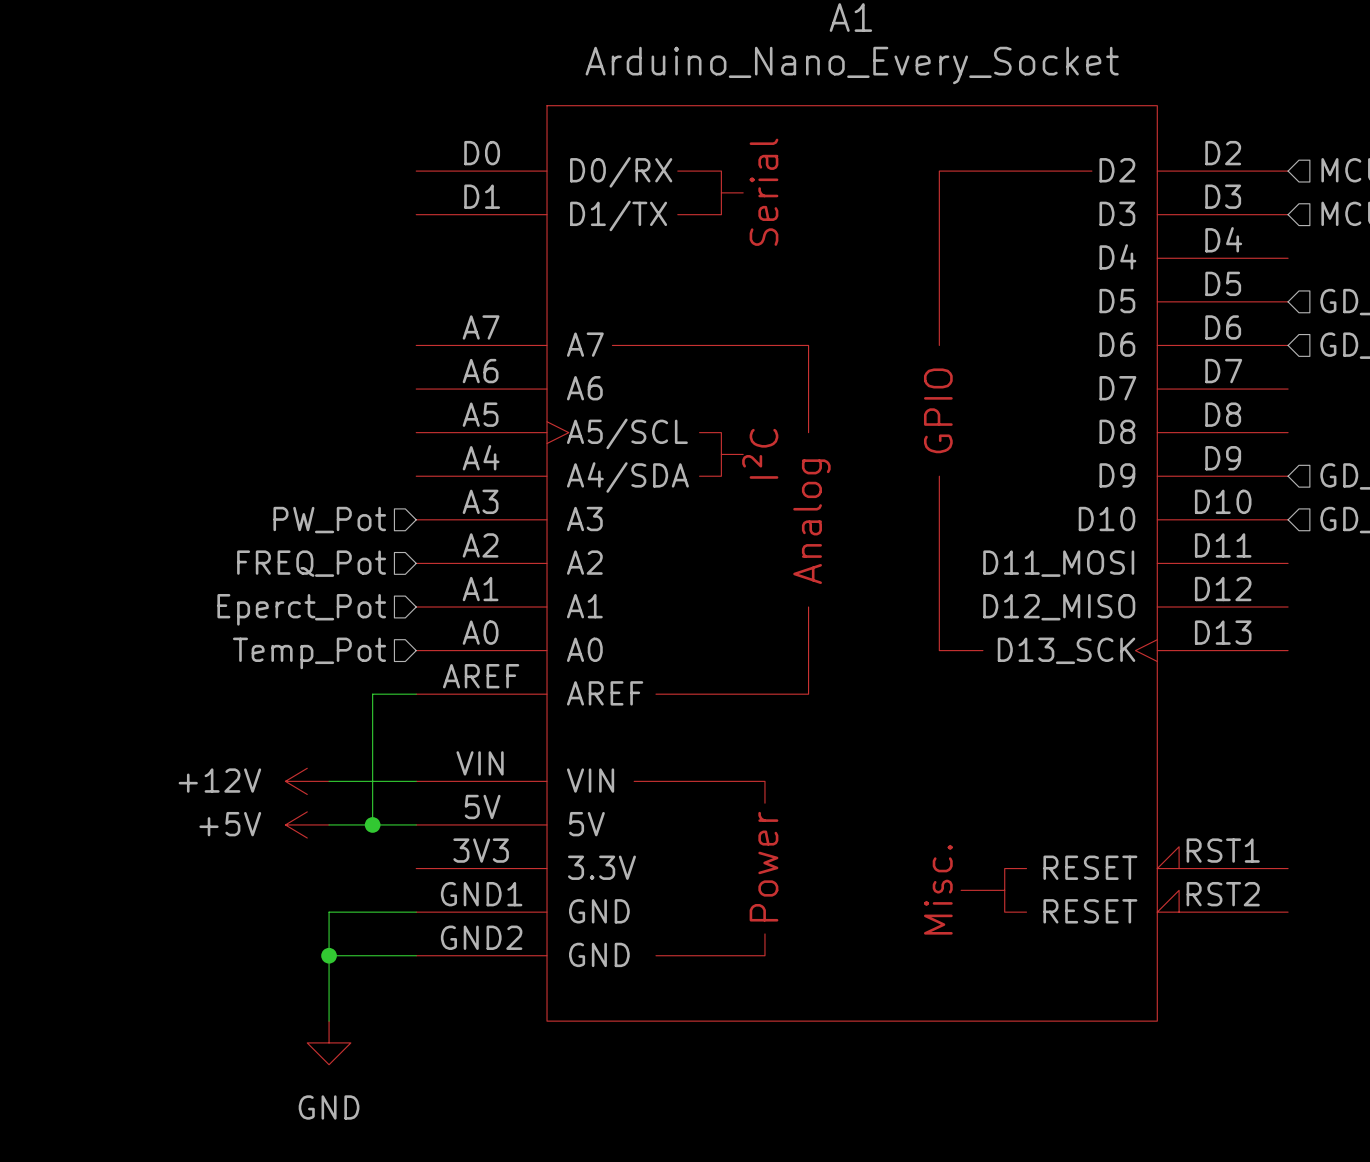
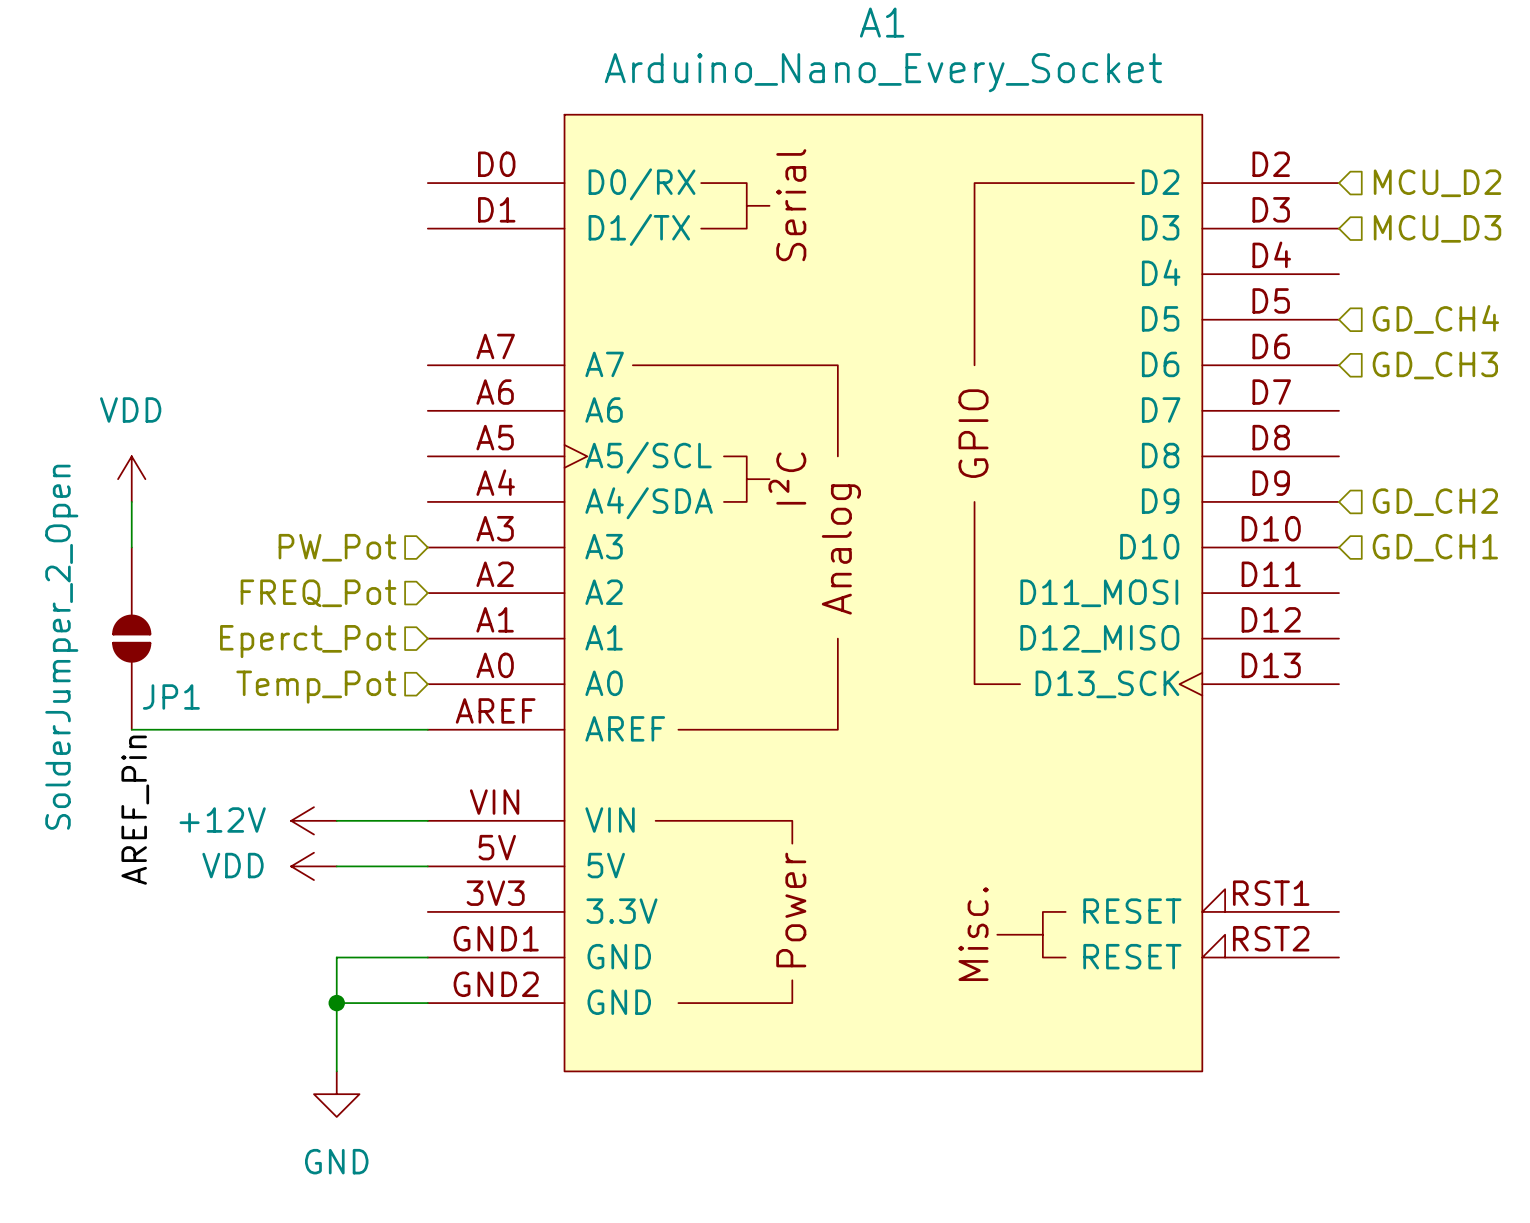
power symbol: none -> VDD (131, 479)
wire: none -> (131, 501) (131, 547)
JP1: none -> SolderJumper_2_Open (131, 638)
wire: (372, 694) (372, 824) -> (382, 729) (131, 729)
label: none -> AREF_Pin (135, 810)
power symbol: +5V (307, 824) -> VDD (313, 866)
junction: (372, 824) -> none

